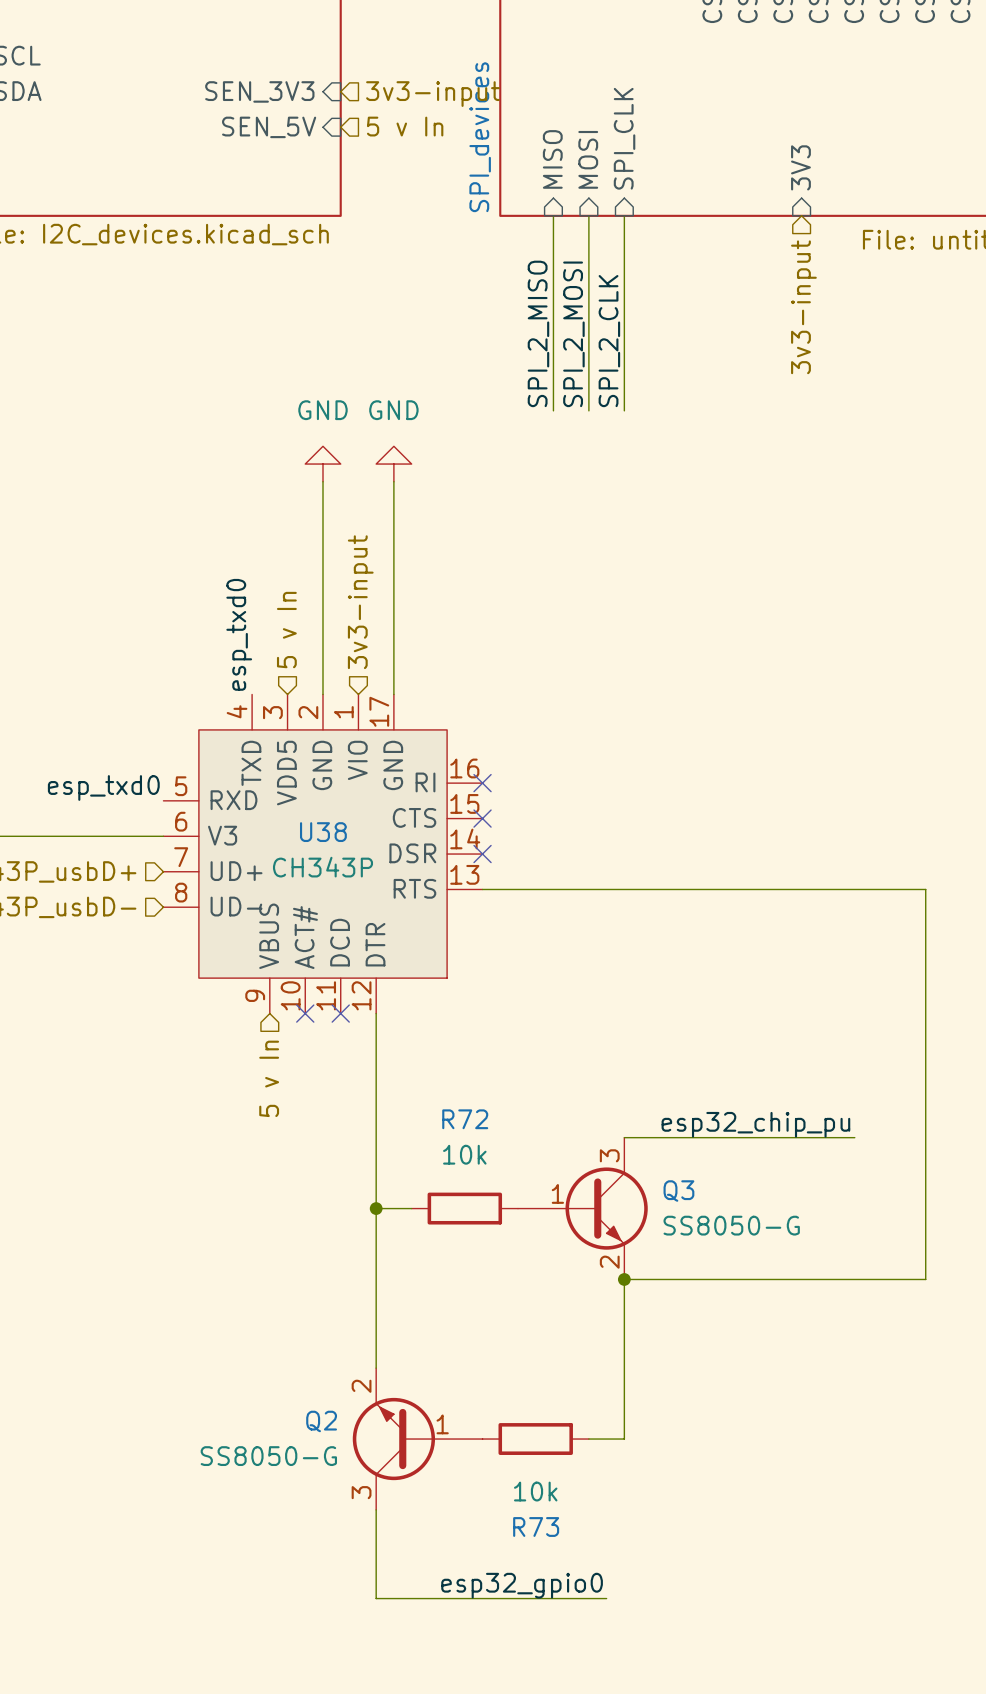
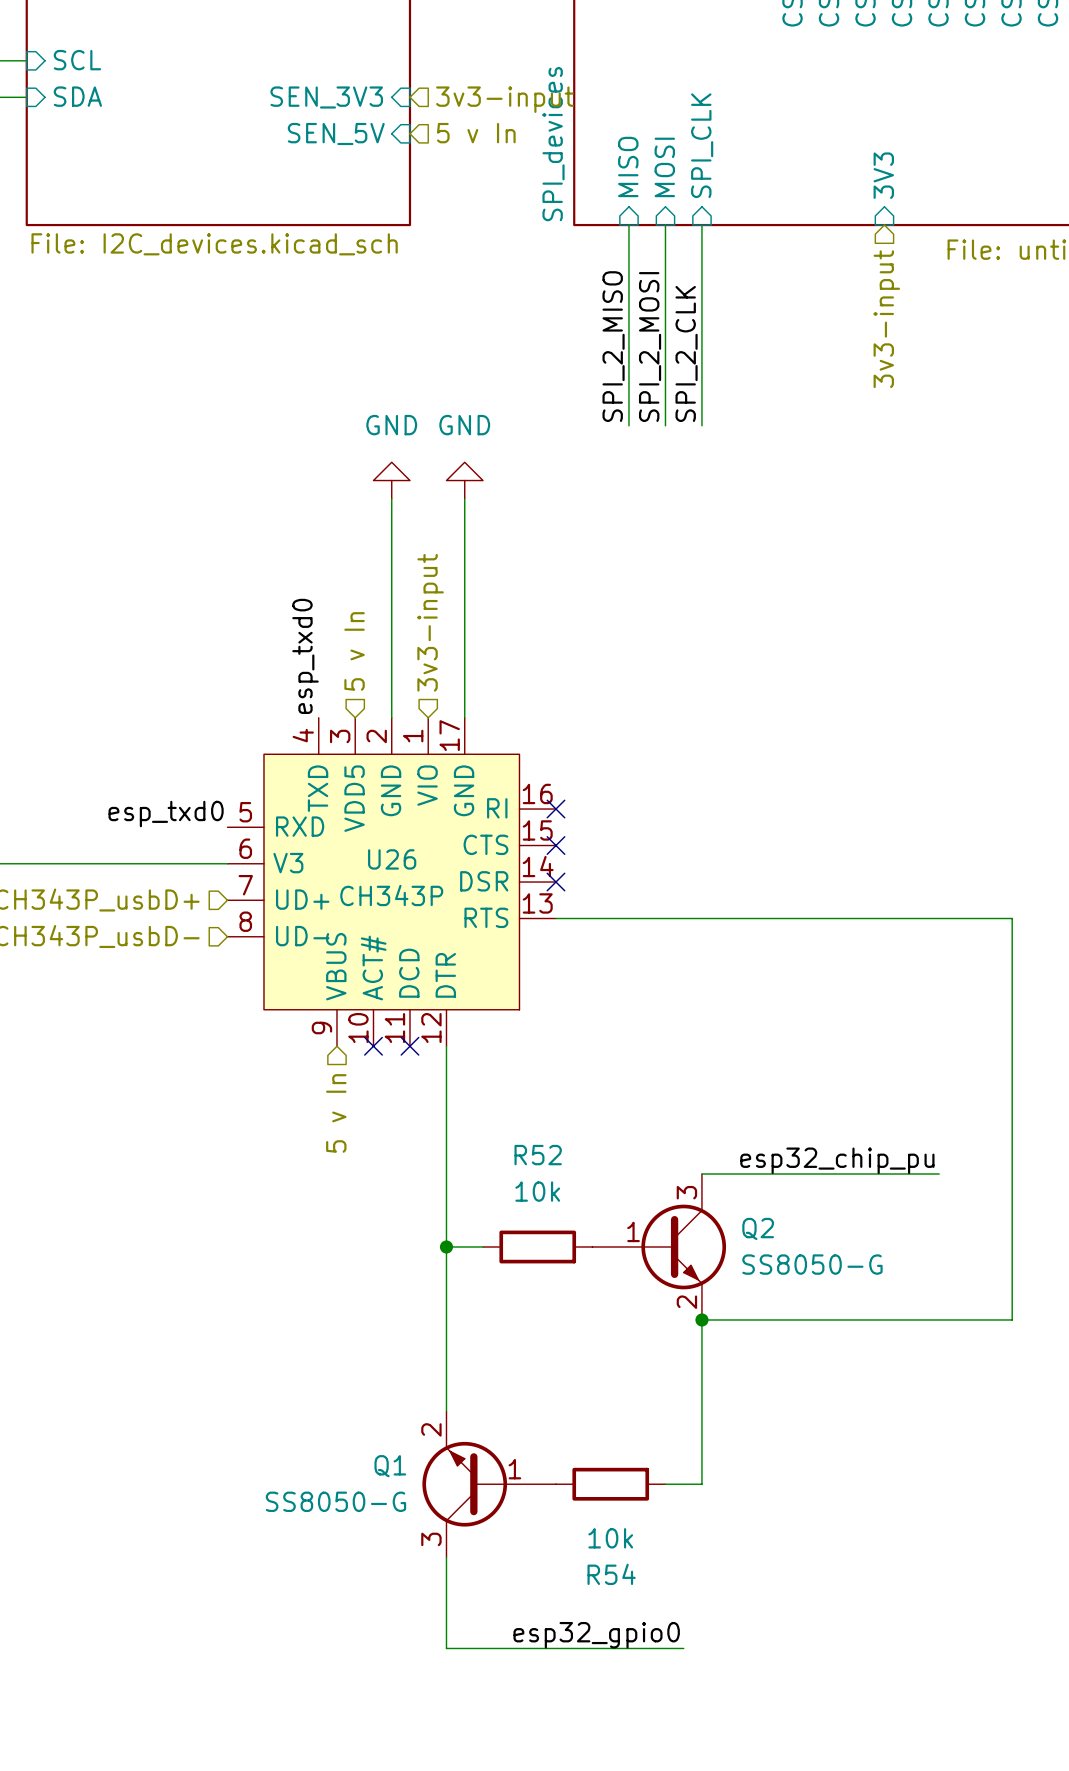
U38 name: U38 (323, 832) -> U26 (392, 859)
R72 name: R72 (465, 1119) -> R52 (538, 1155)
Q3 name: Q3 (678, 1191) -> Q2 (758, 1228)
Q2 name: Q2 (321, 1421) -> Q1 (390, 1466)
R73 name: R73 (536, 1526) -> R54 (611, 1574)

